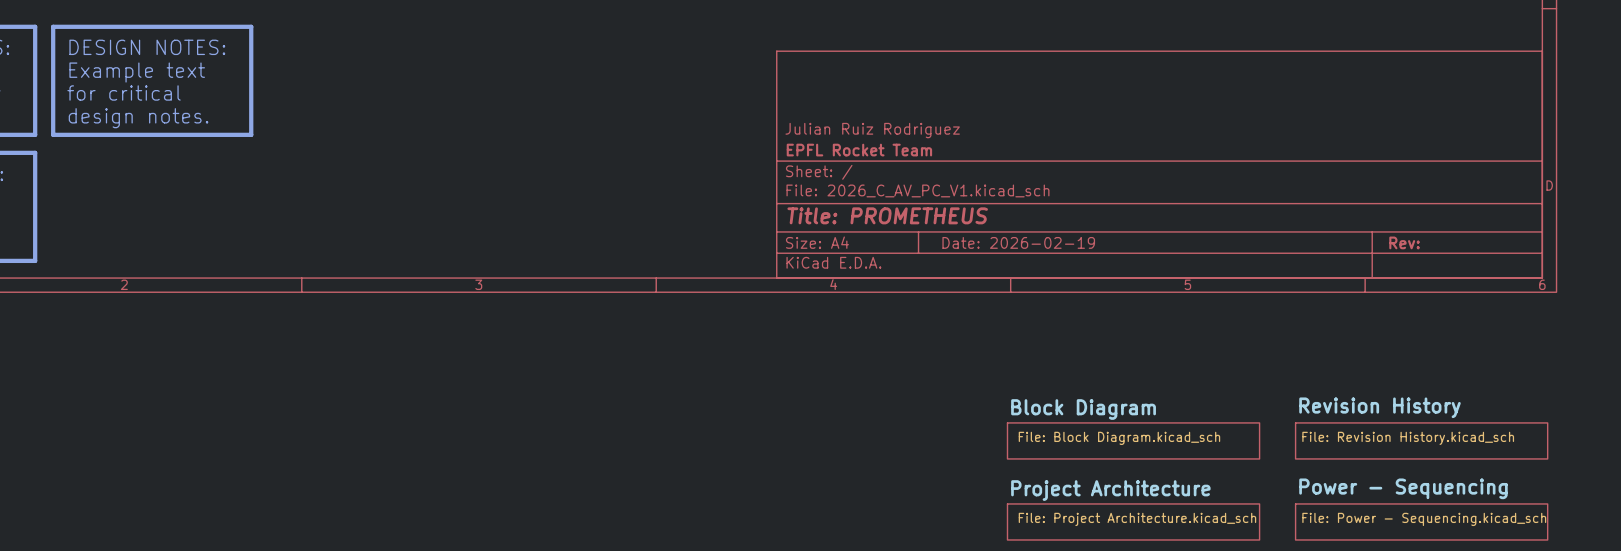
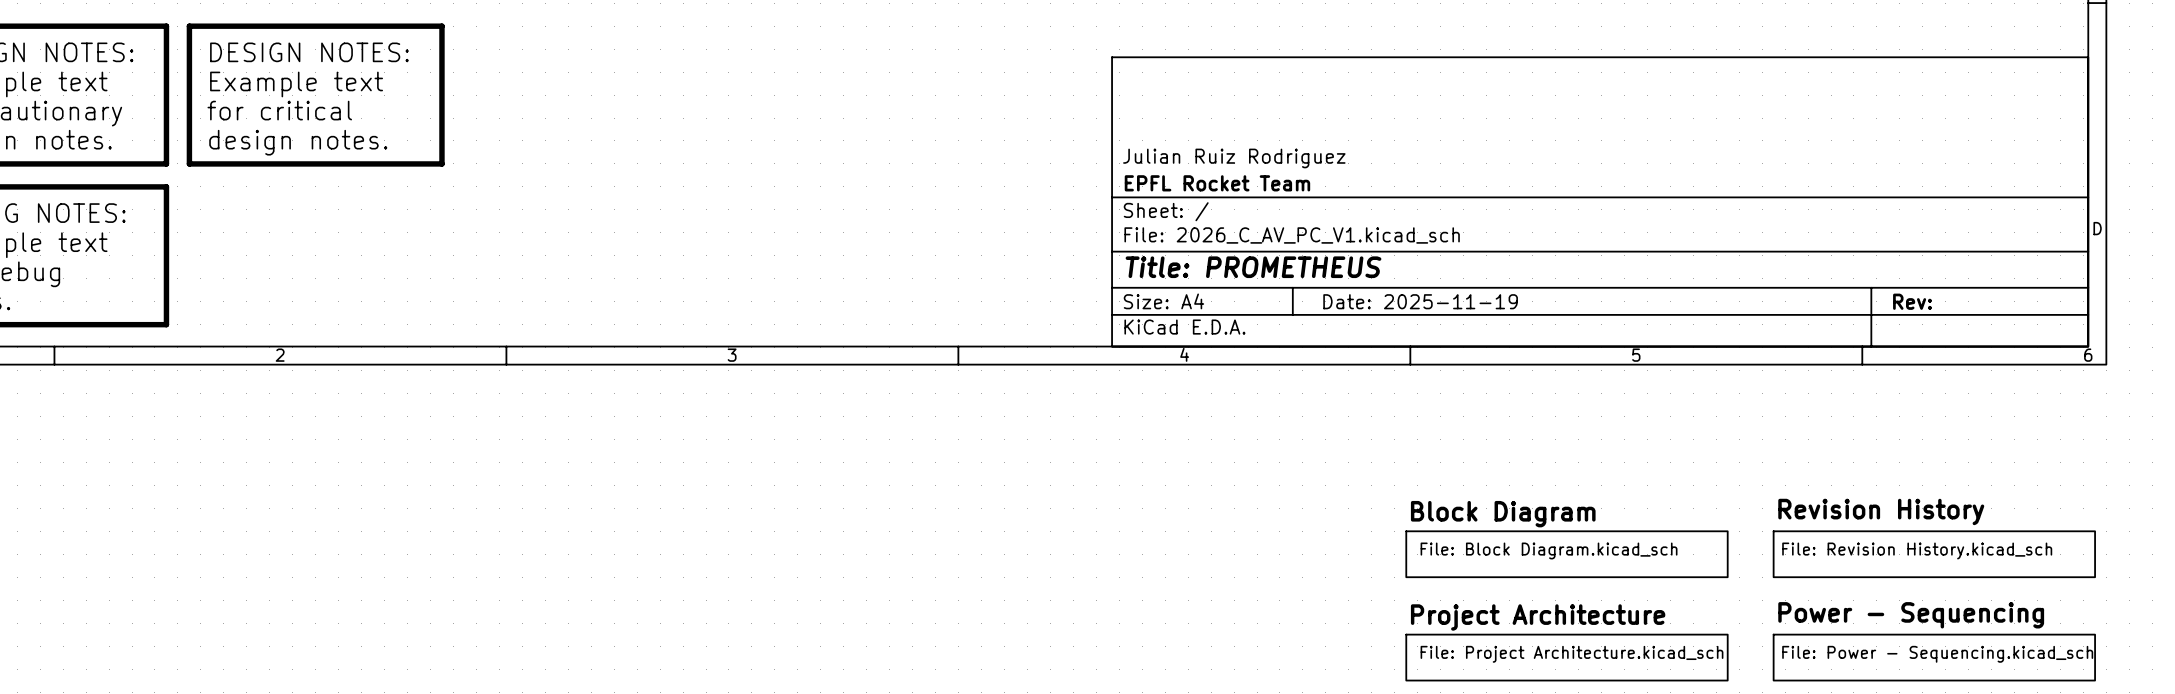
title block: Date: 2026-02-19 (1018, 242) -> Date: 2025-11-19 (1420, 301)

